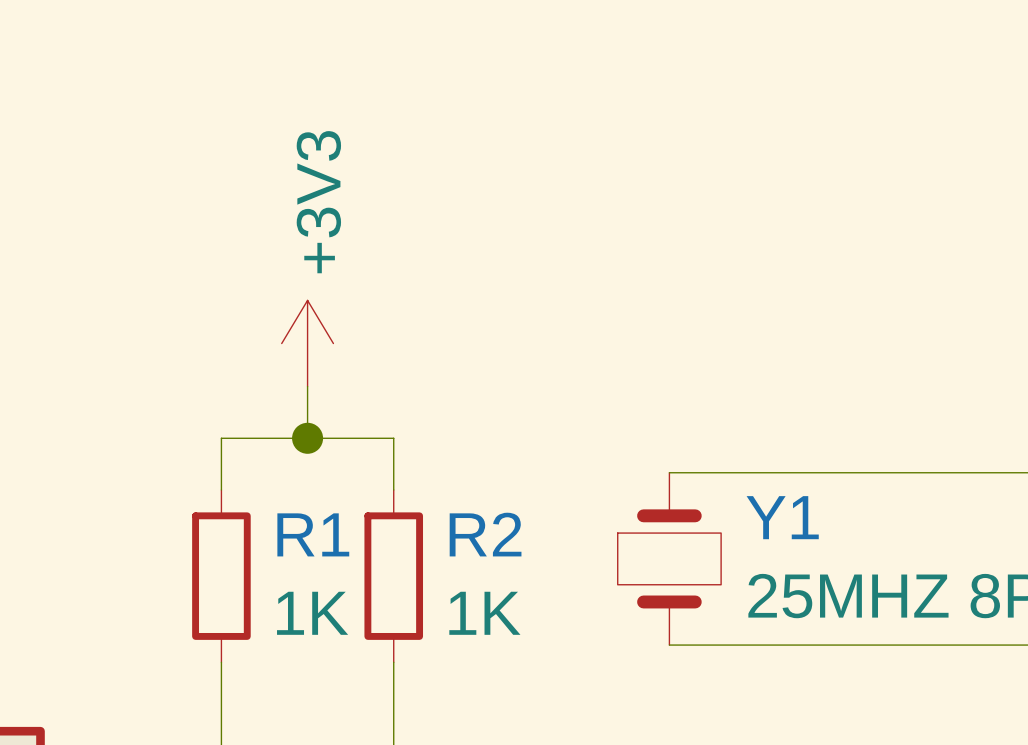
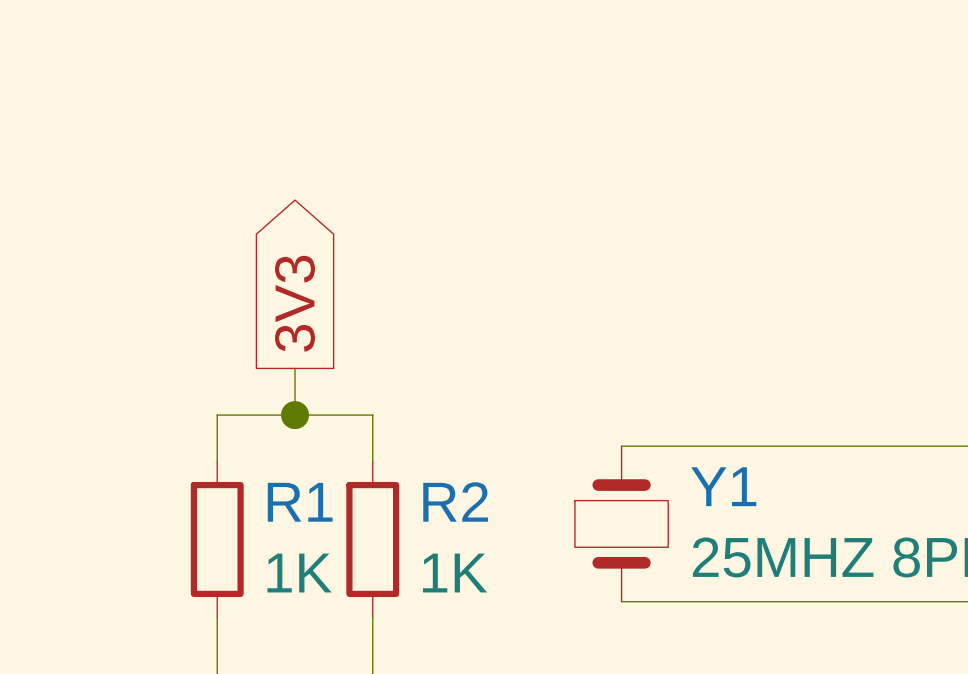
global label: none -> 3V3 (294, 303)
power symbol: +3V3 (307, 343) -> none

